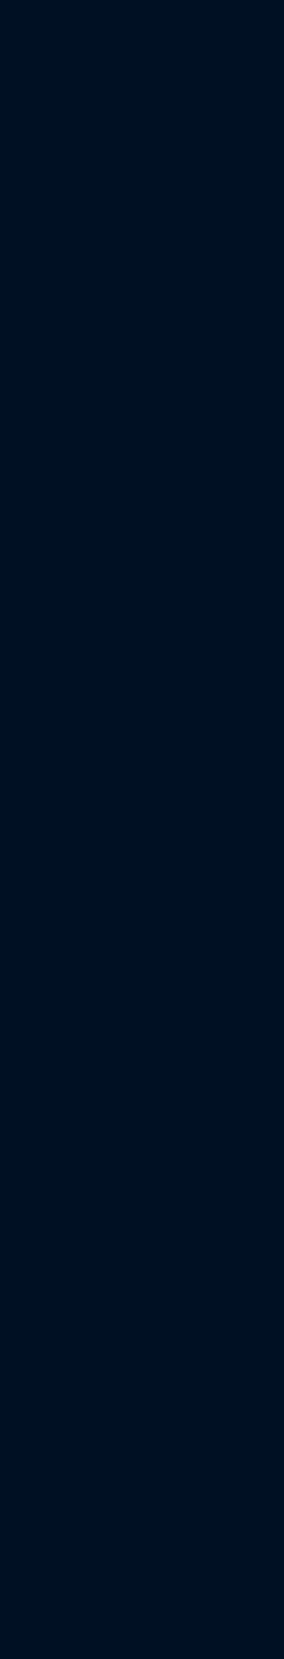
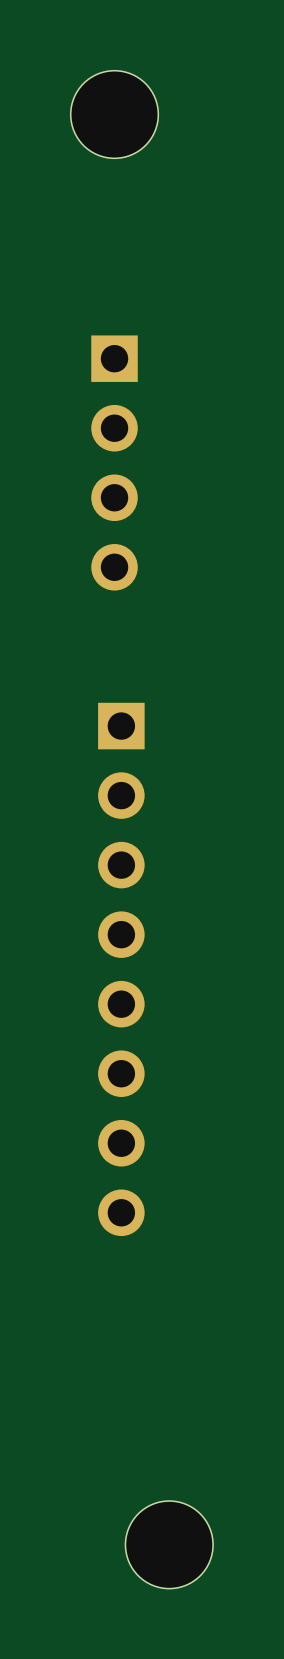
part: none -> (114, 114)
part: none -> (114, 462)
part: none -> (121, 969)
part: none -> (169, 1544)

